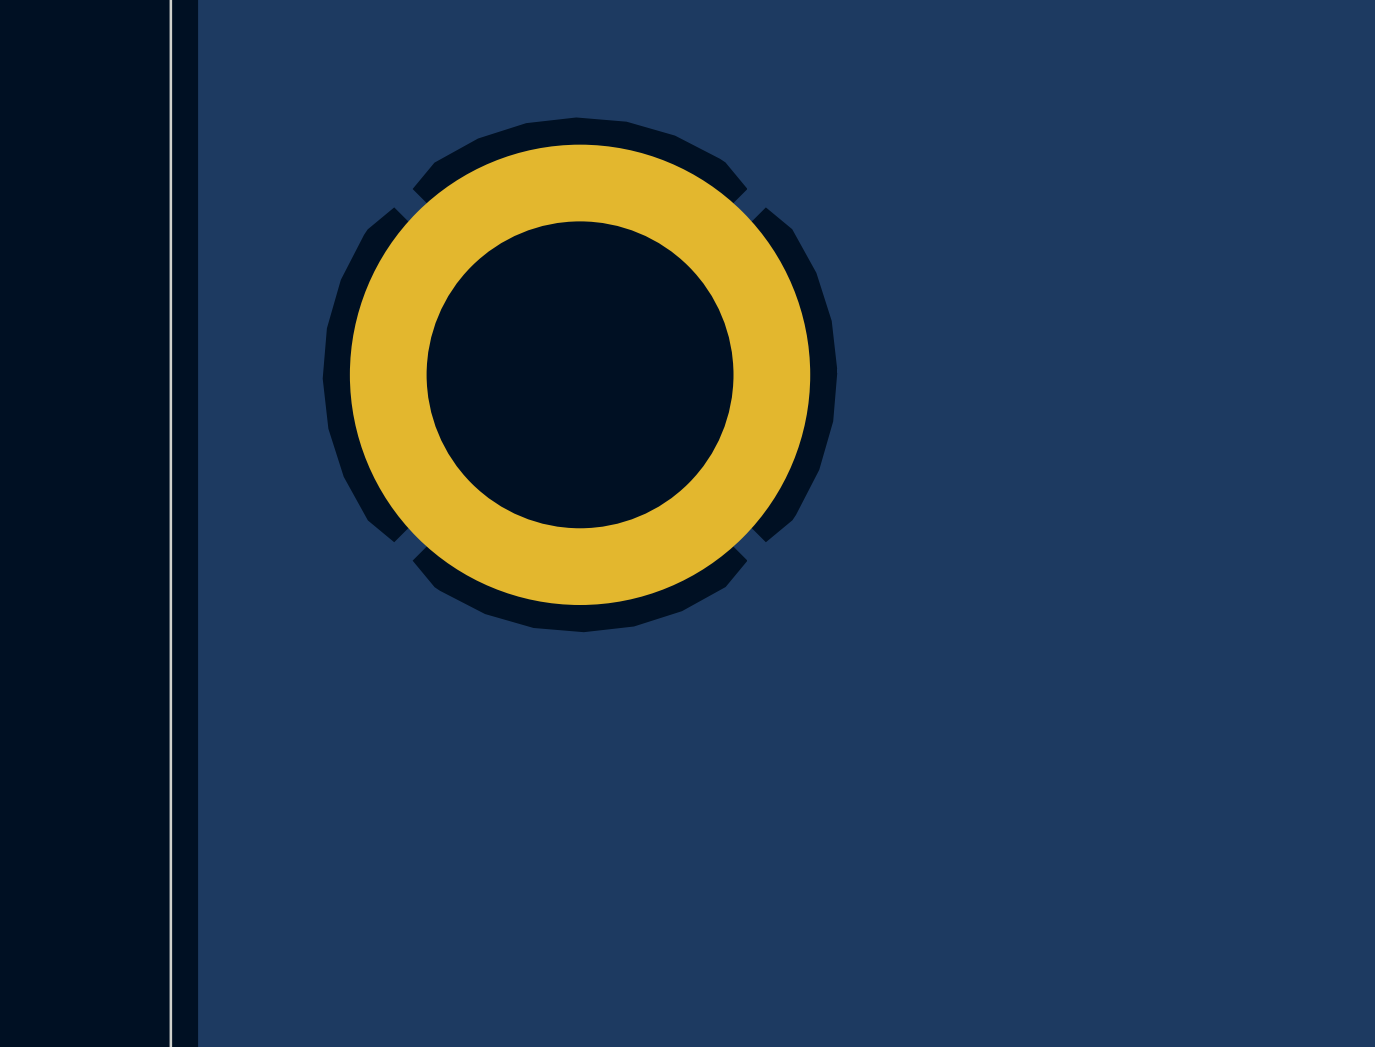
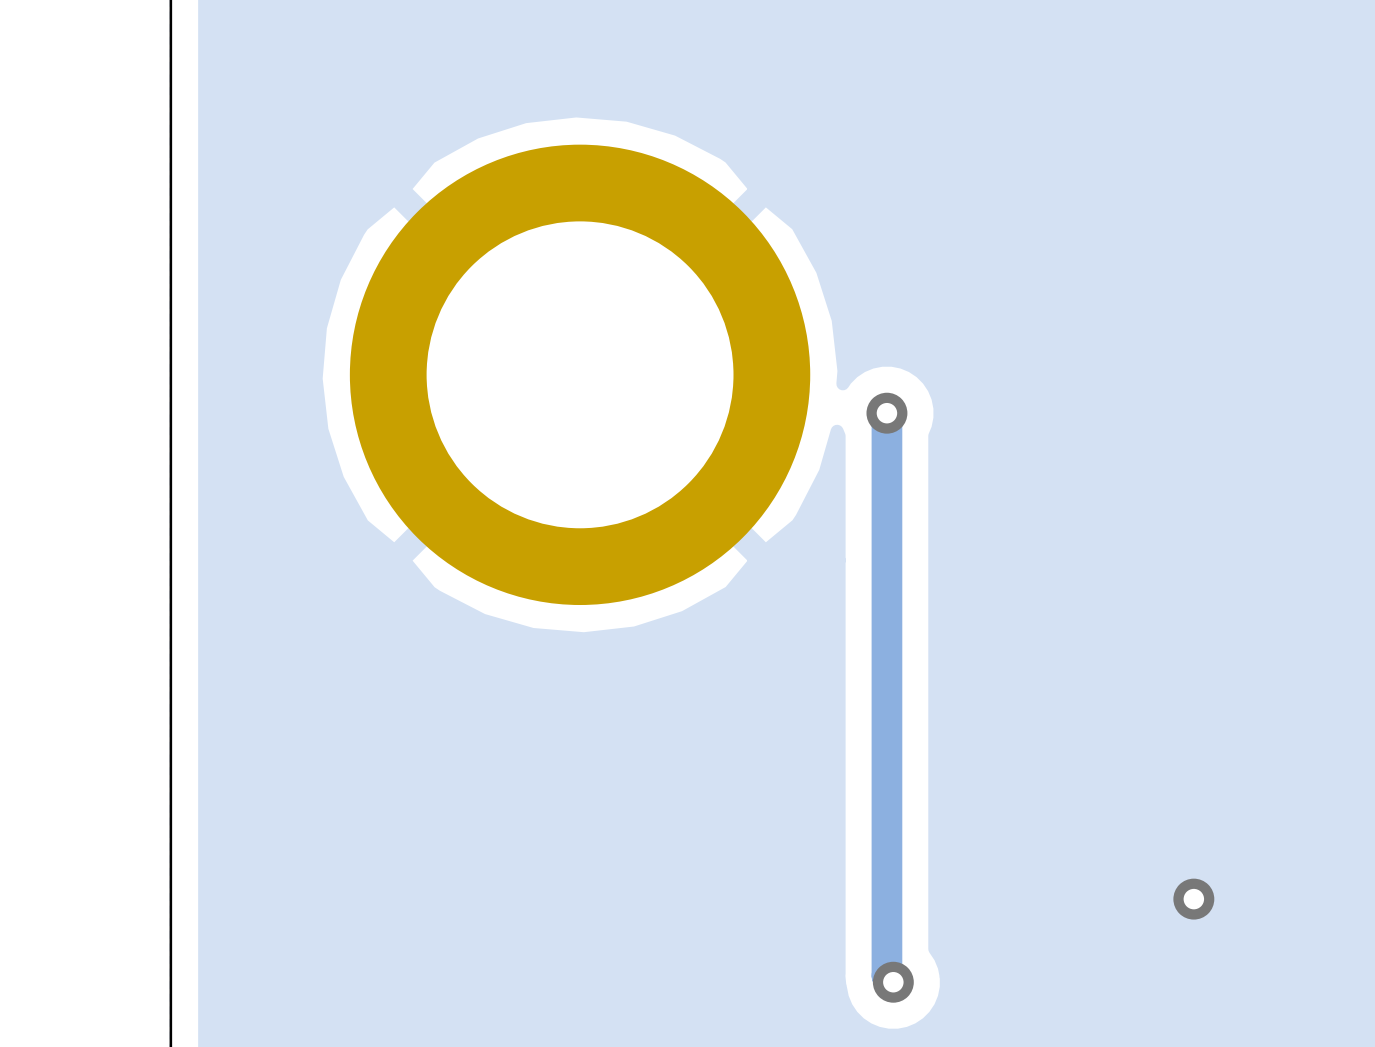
track: none -> (886, 413) (886, 975) (893, 982)
via: none -> (886, 413)
via: none -> (1193, 899)
via: none -> (893, 982)

